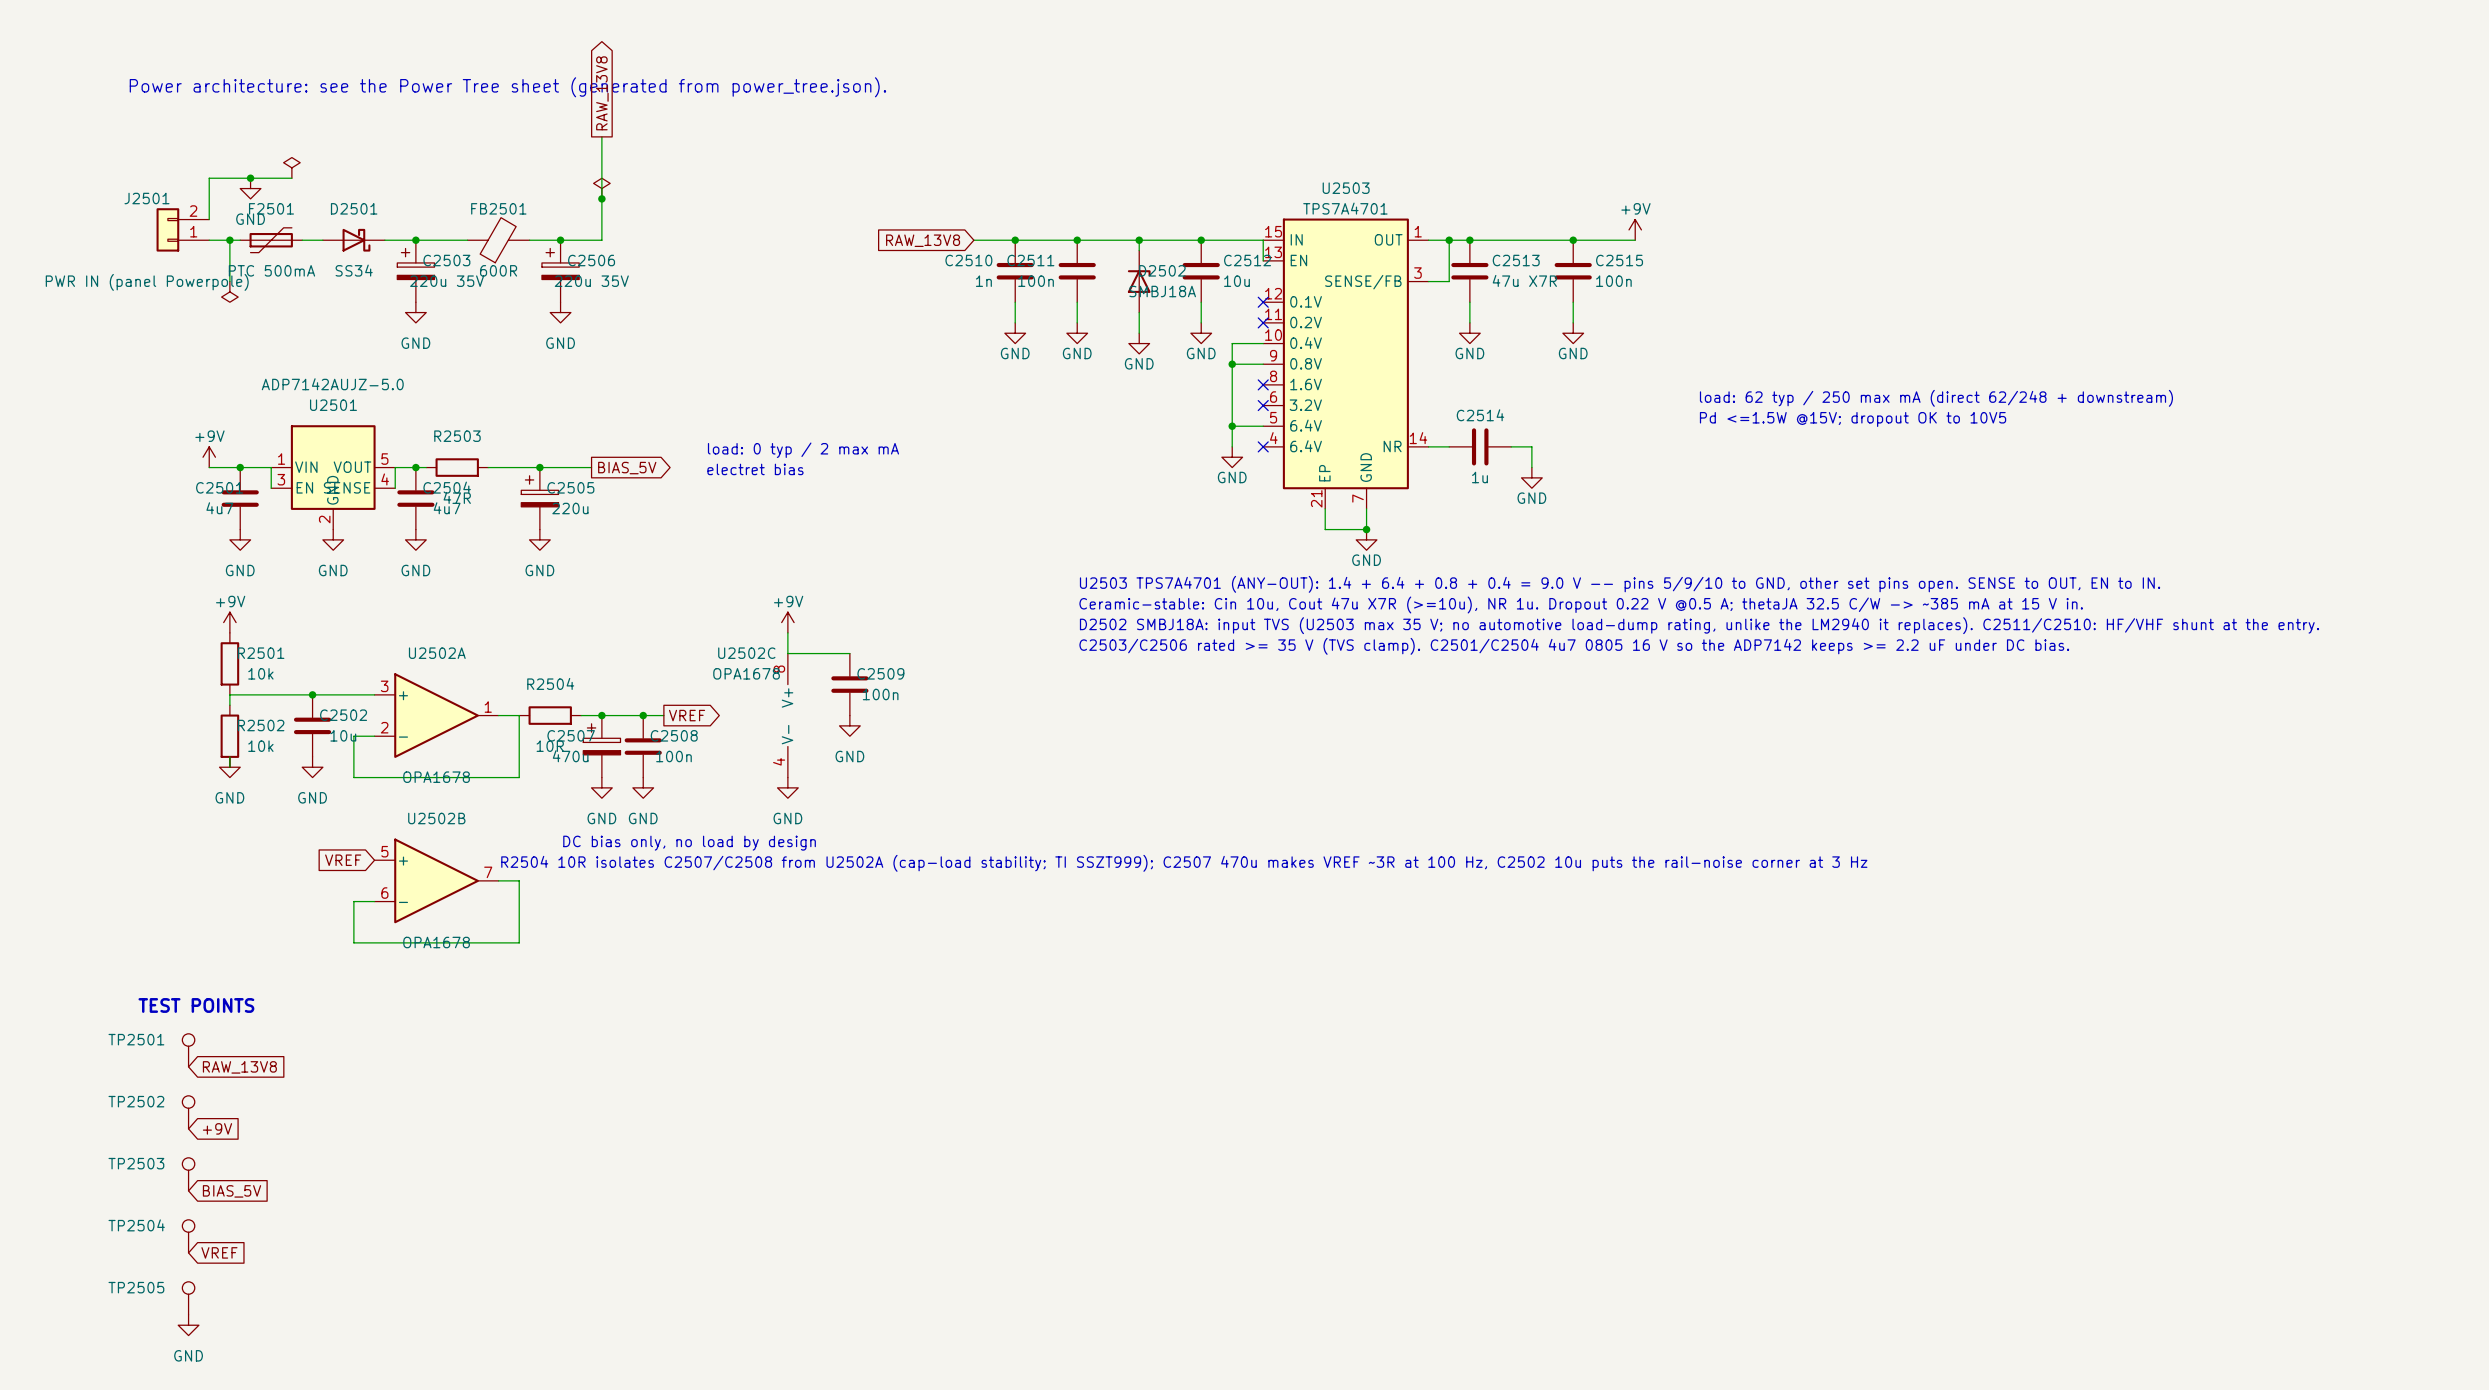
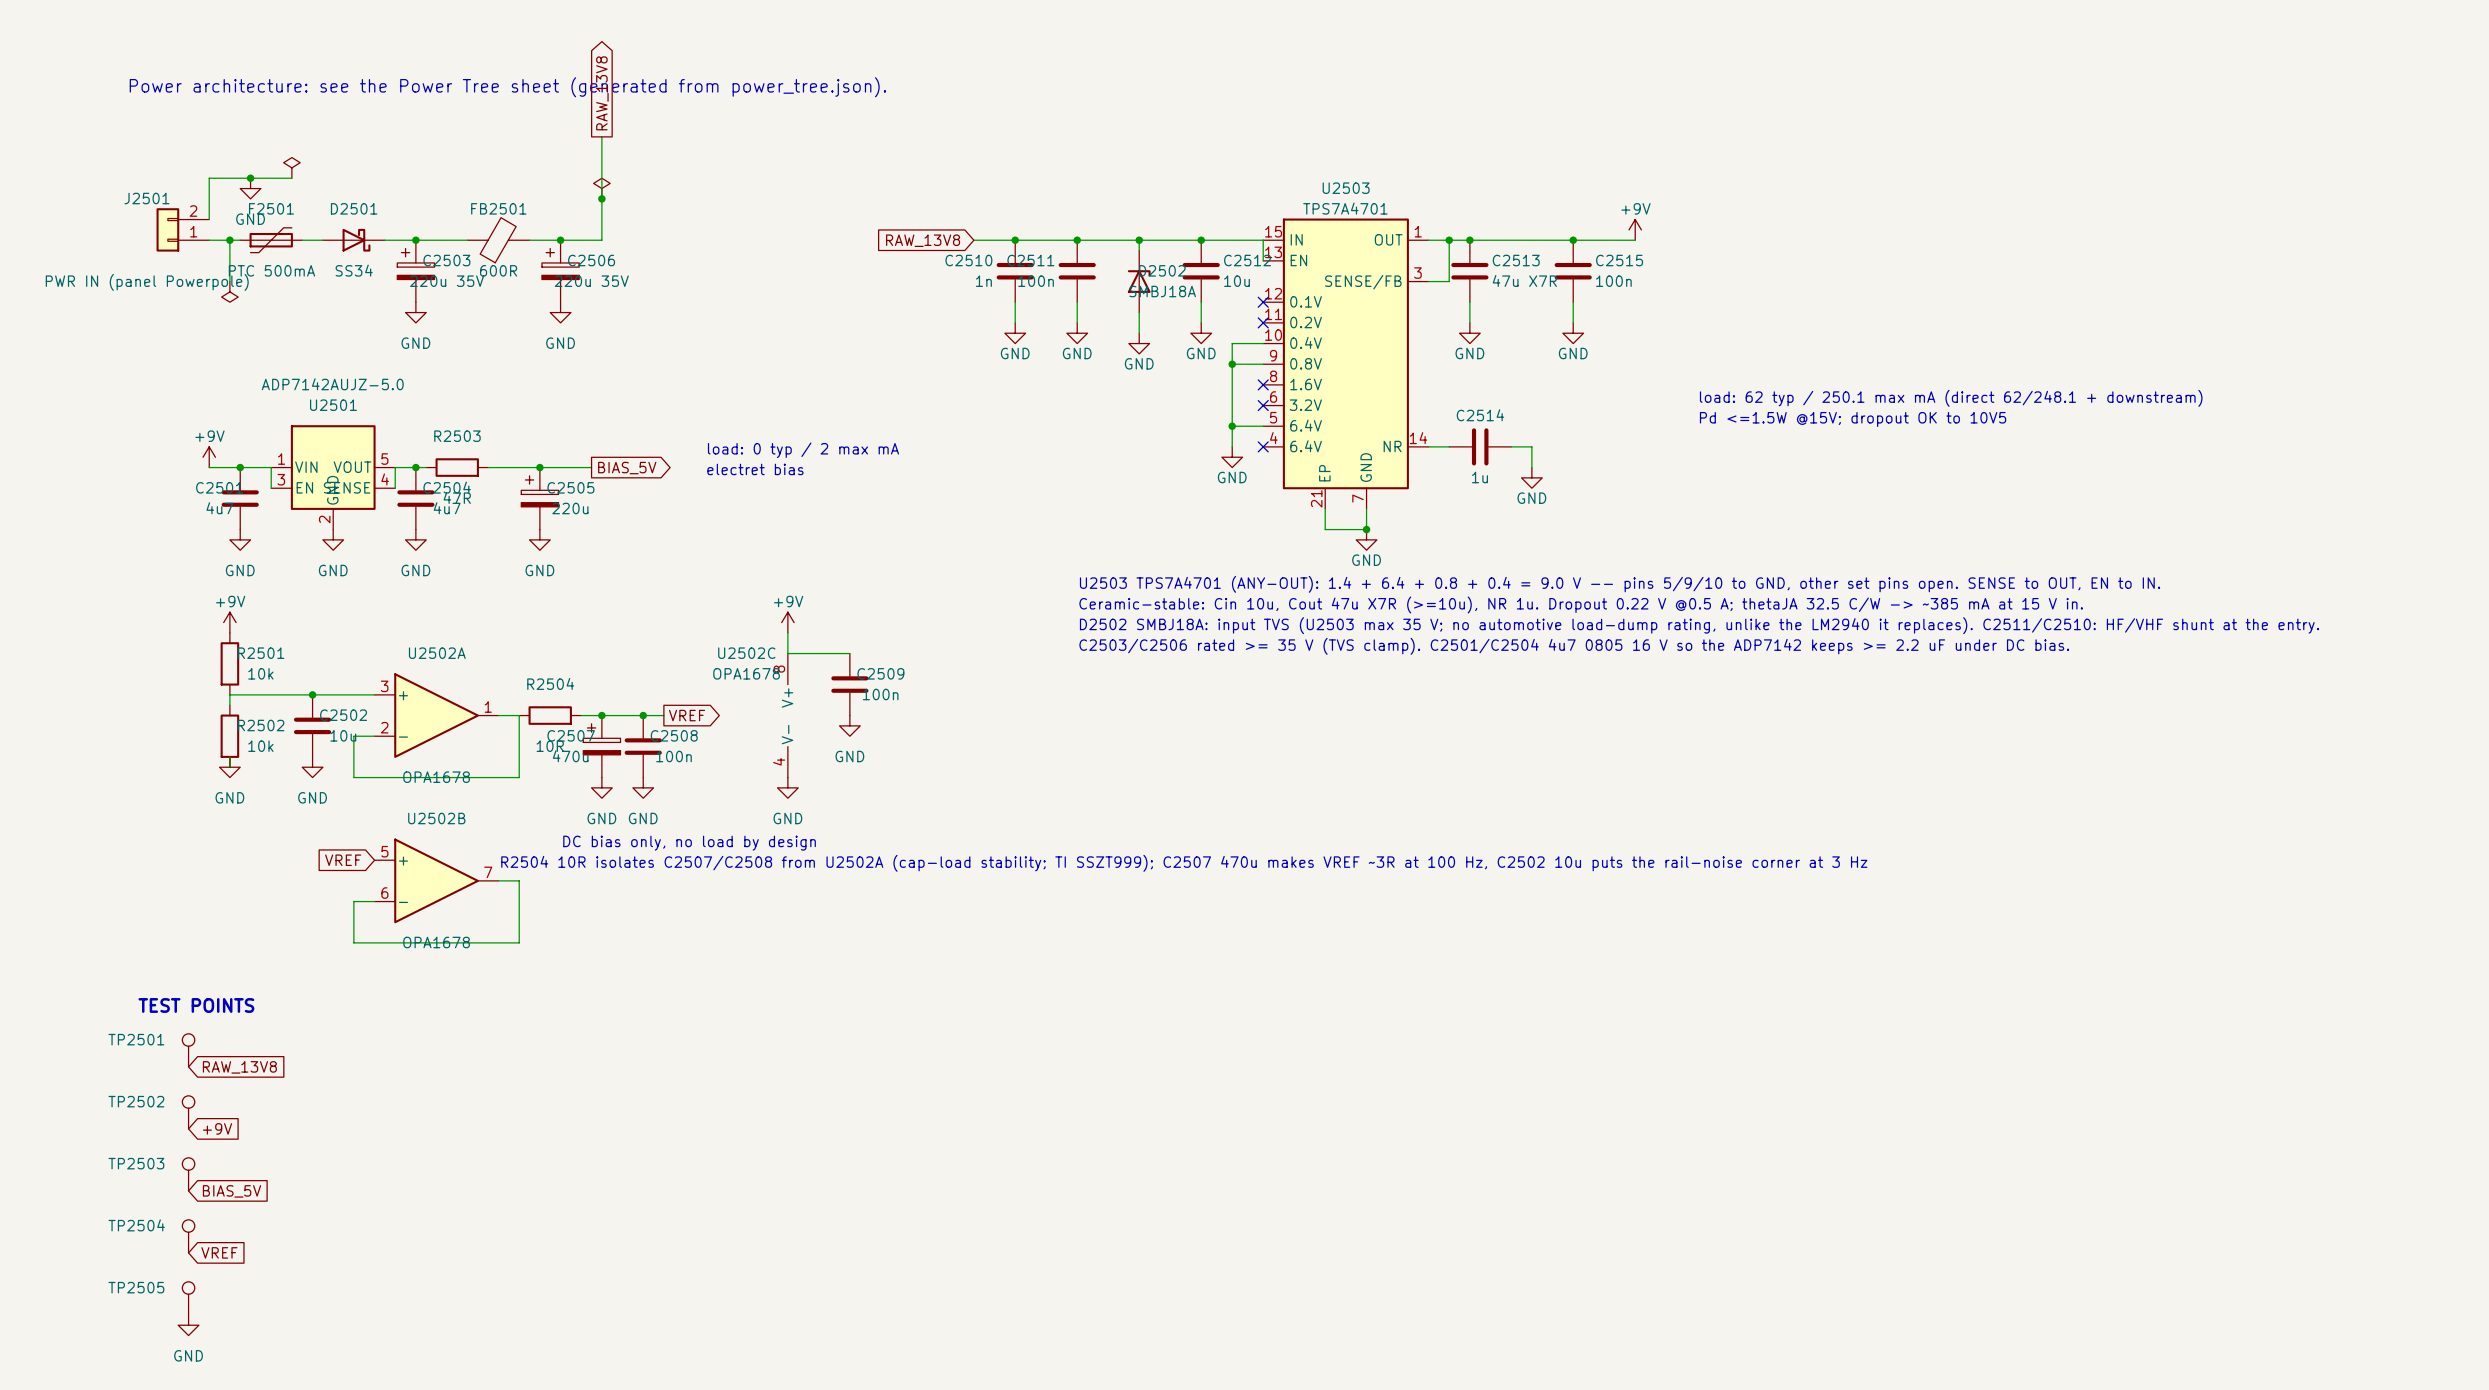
text: load: 62 typ / 250 max mA (direct 62/248 + downstream) (1936, 398) -> load: 62 typ / 250.1 max mA (direct 62/248.1 + downstream) (1951, 398)

